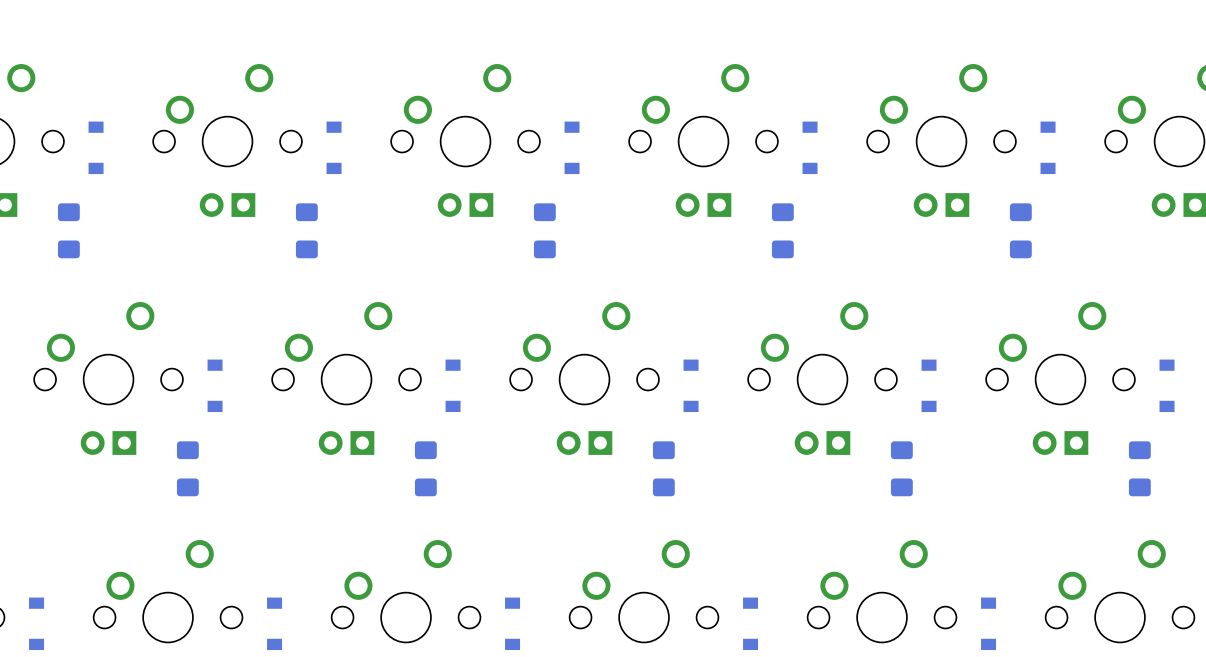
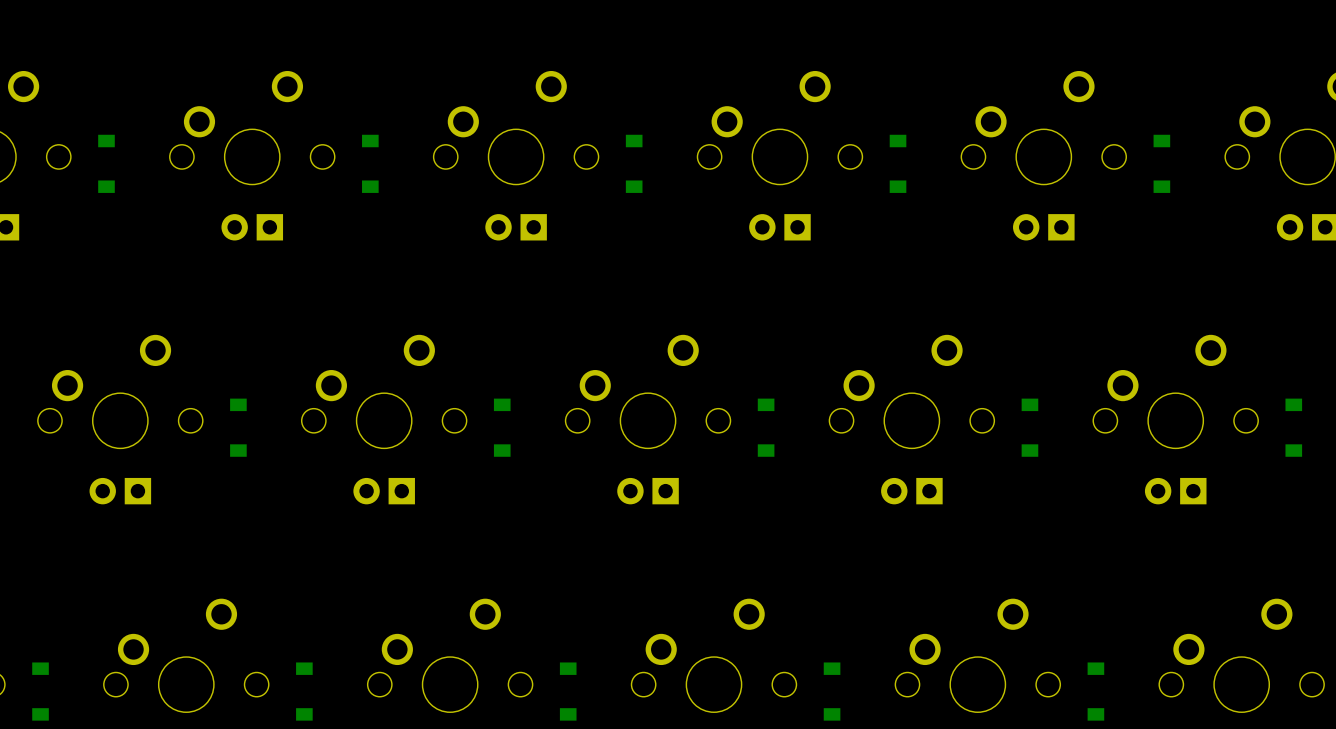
part: (68, 230) -> none
part: (306, 230) -> none
part: (544, 230) -> none
part: (782, 230) -> none
part: (1020, 230) -> none
part: (187, 468) -> none
part: (425, 468) -> none
part: (663, 468) -> none
part: (901, 468) -> none
part: (1139, 468) -> none

